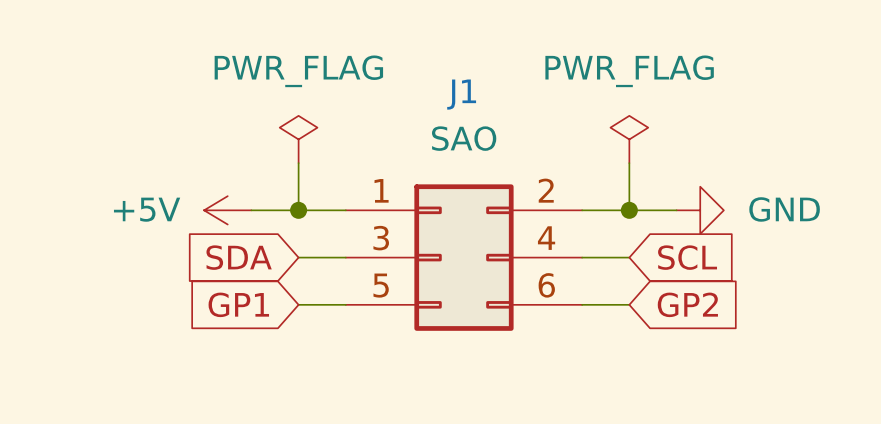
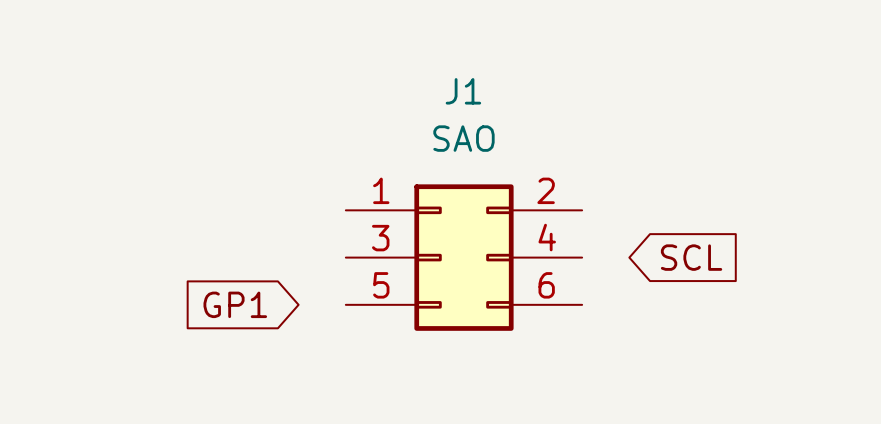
power symbol: PWR_FLAG (298, 139) -> none
power symbol: PWR_FLAG (629, 139) -> none
wire: (298, 163) (298, 210) -> none
wire: (629, 163) (629, 210) -> none
power symbol: +5V (227, 210) -> none
wire: (251, 210) (345, 210) -> none
junction: (298, 210) -> none
wire: (582, 210) (676, 210) -> none
junction: (629, 210) -> none
power symbol: GND (700, 210) -> none
global label: SDA (239, 257) -> none
wire: (298, 257) (345, 257) -> none
wire: (582, 257) (629, 257) -> none
wire: (298, 304) (345, 304) -> none
wire: (582, 304) (629, 304) -> none
global label: GP2 (687, 304) -> none

